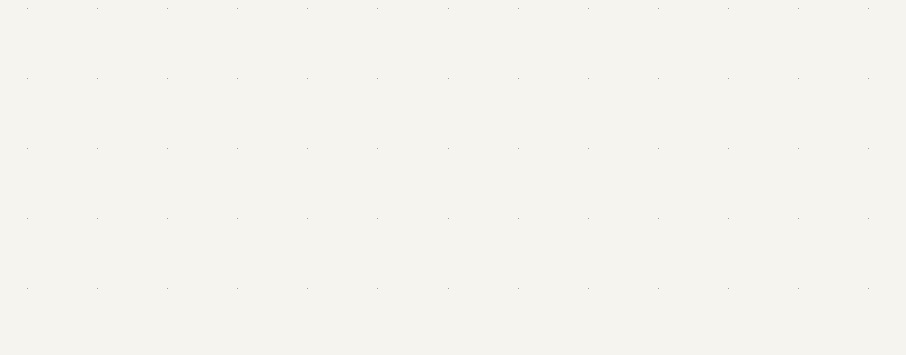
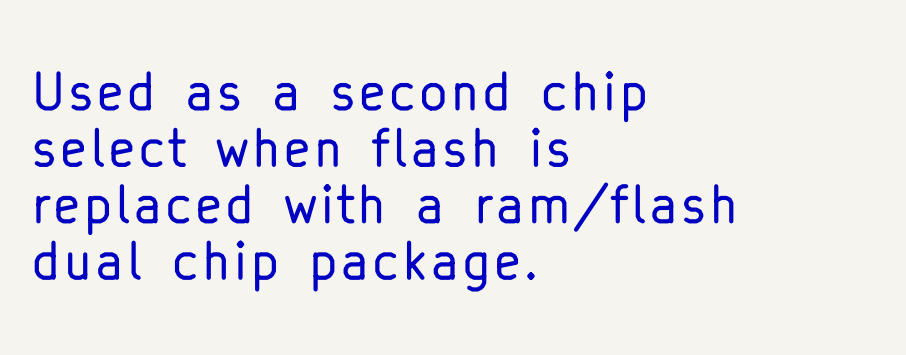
text: none -> Used as a second chip (340, 96)
text: none -> select when flash is (301, 147)
text: none -> replaced with a ram/flash (384, 208)
text: none -> dual chip package. (284, 266)

